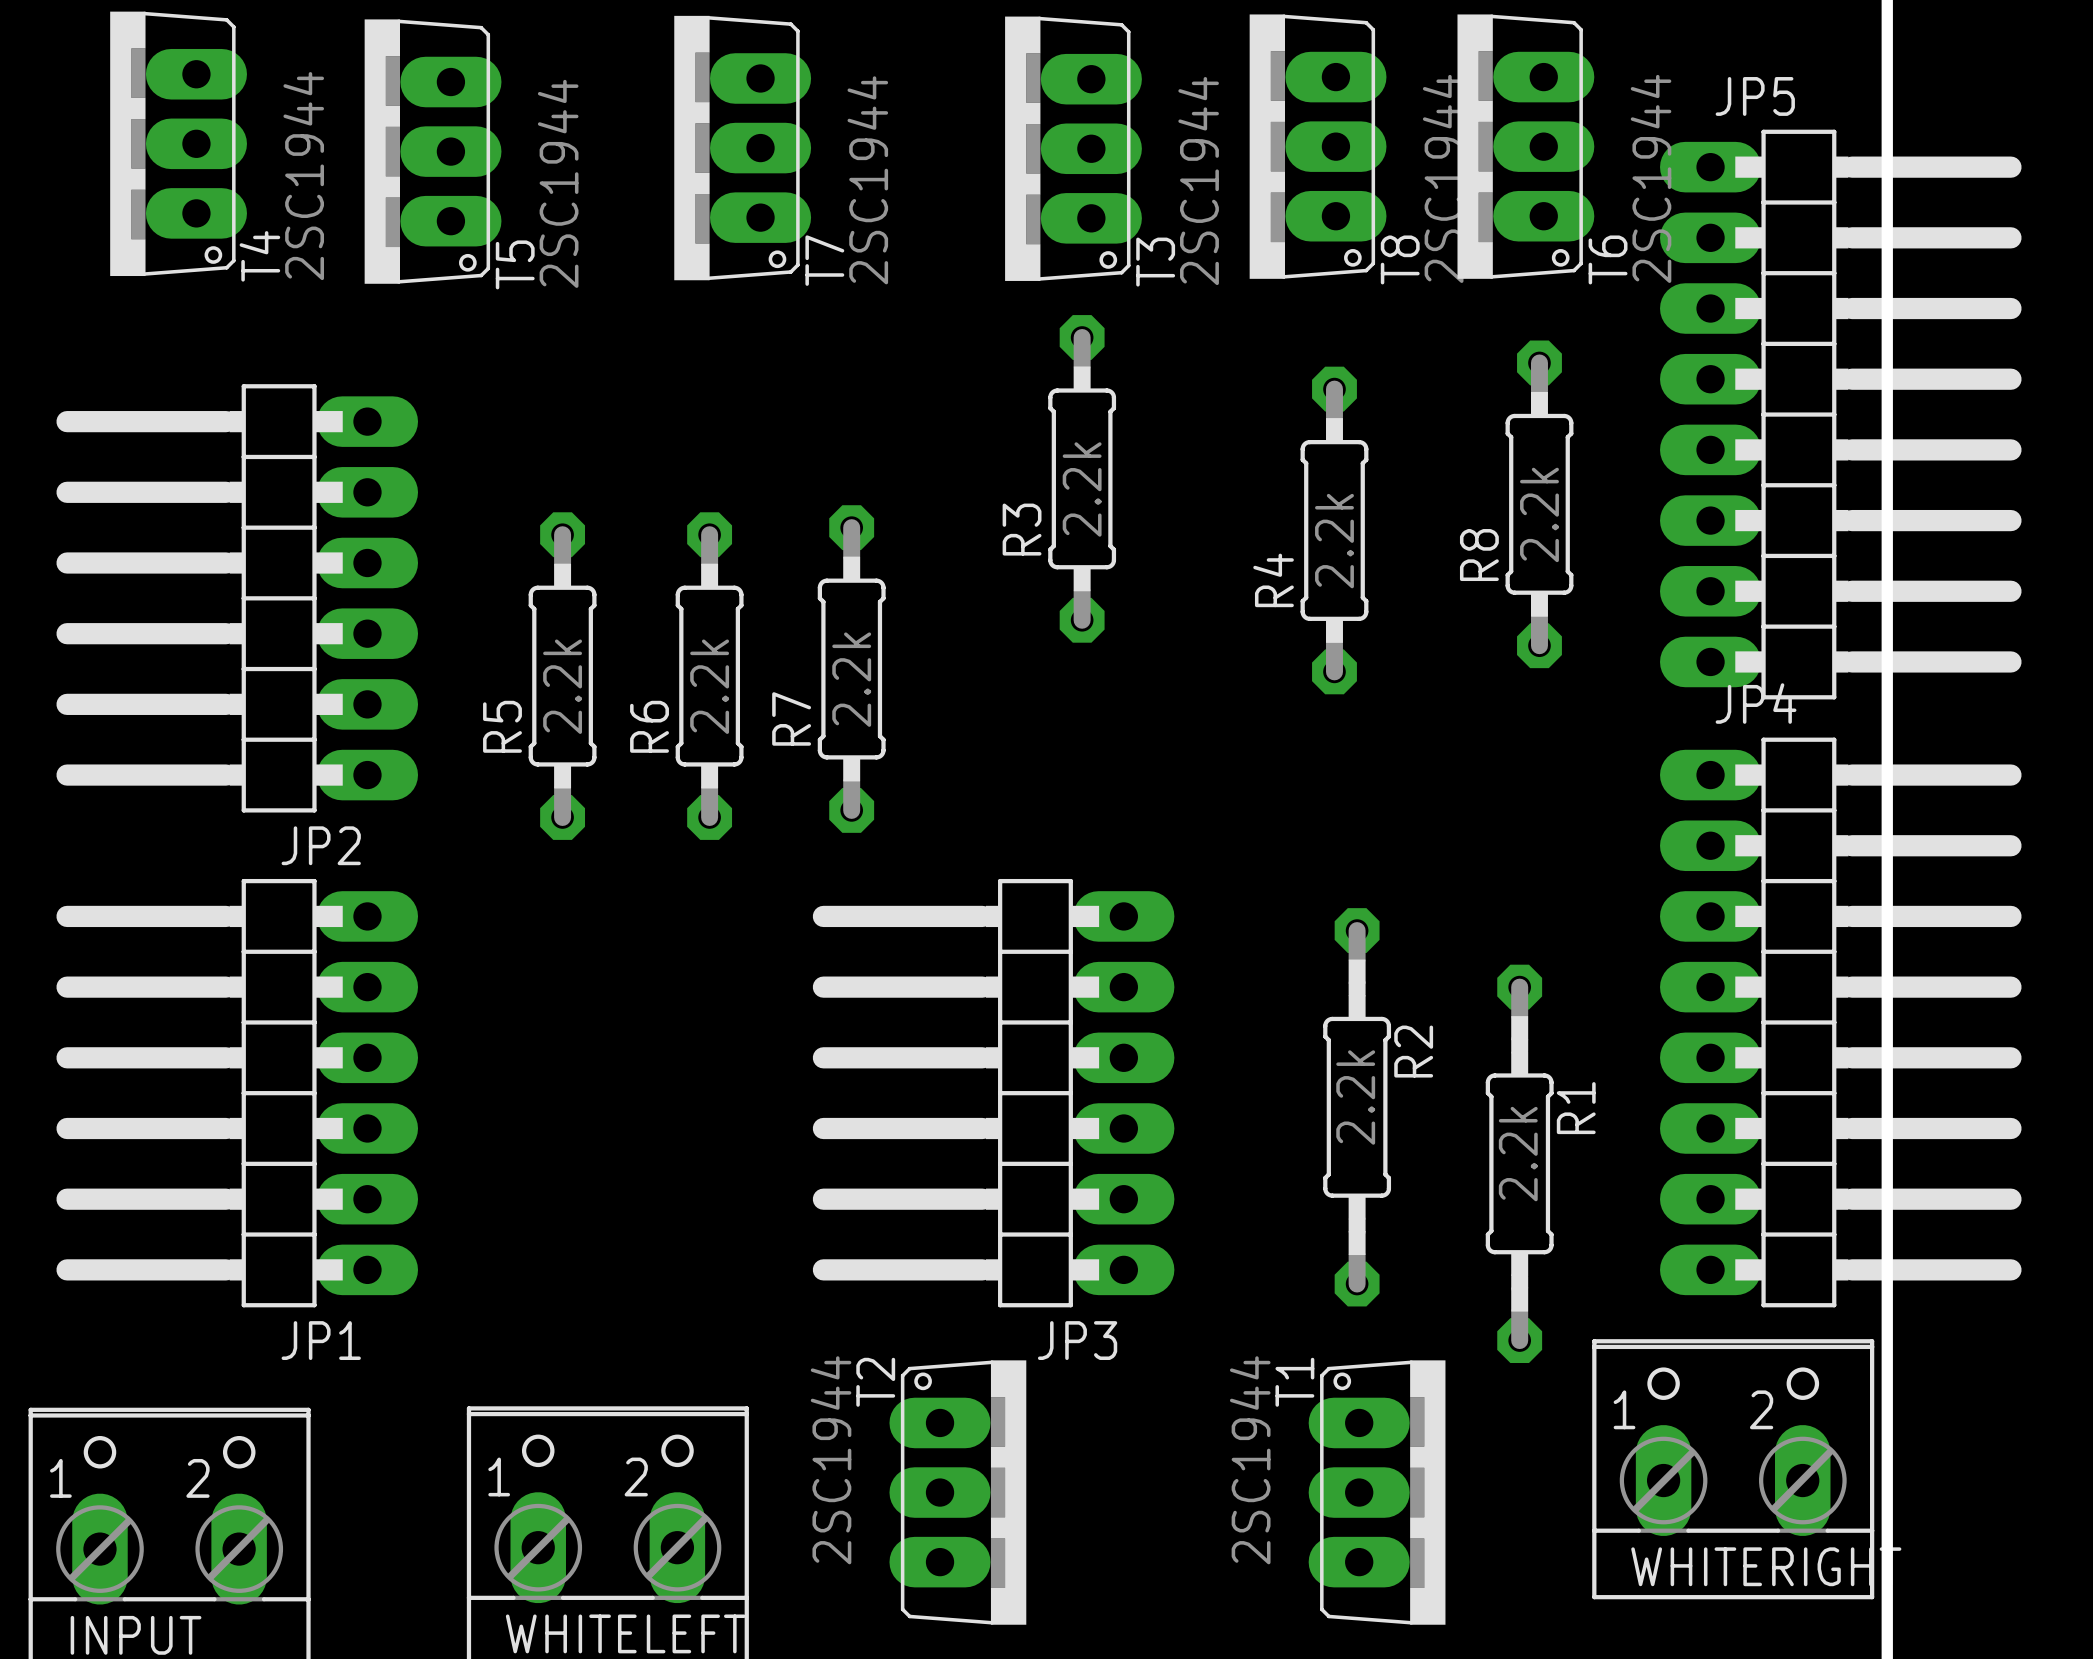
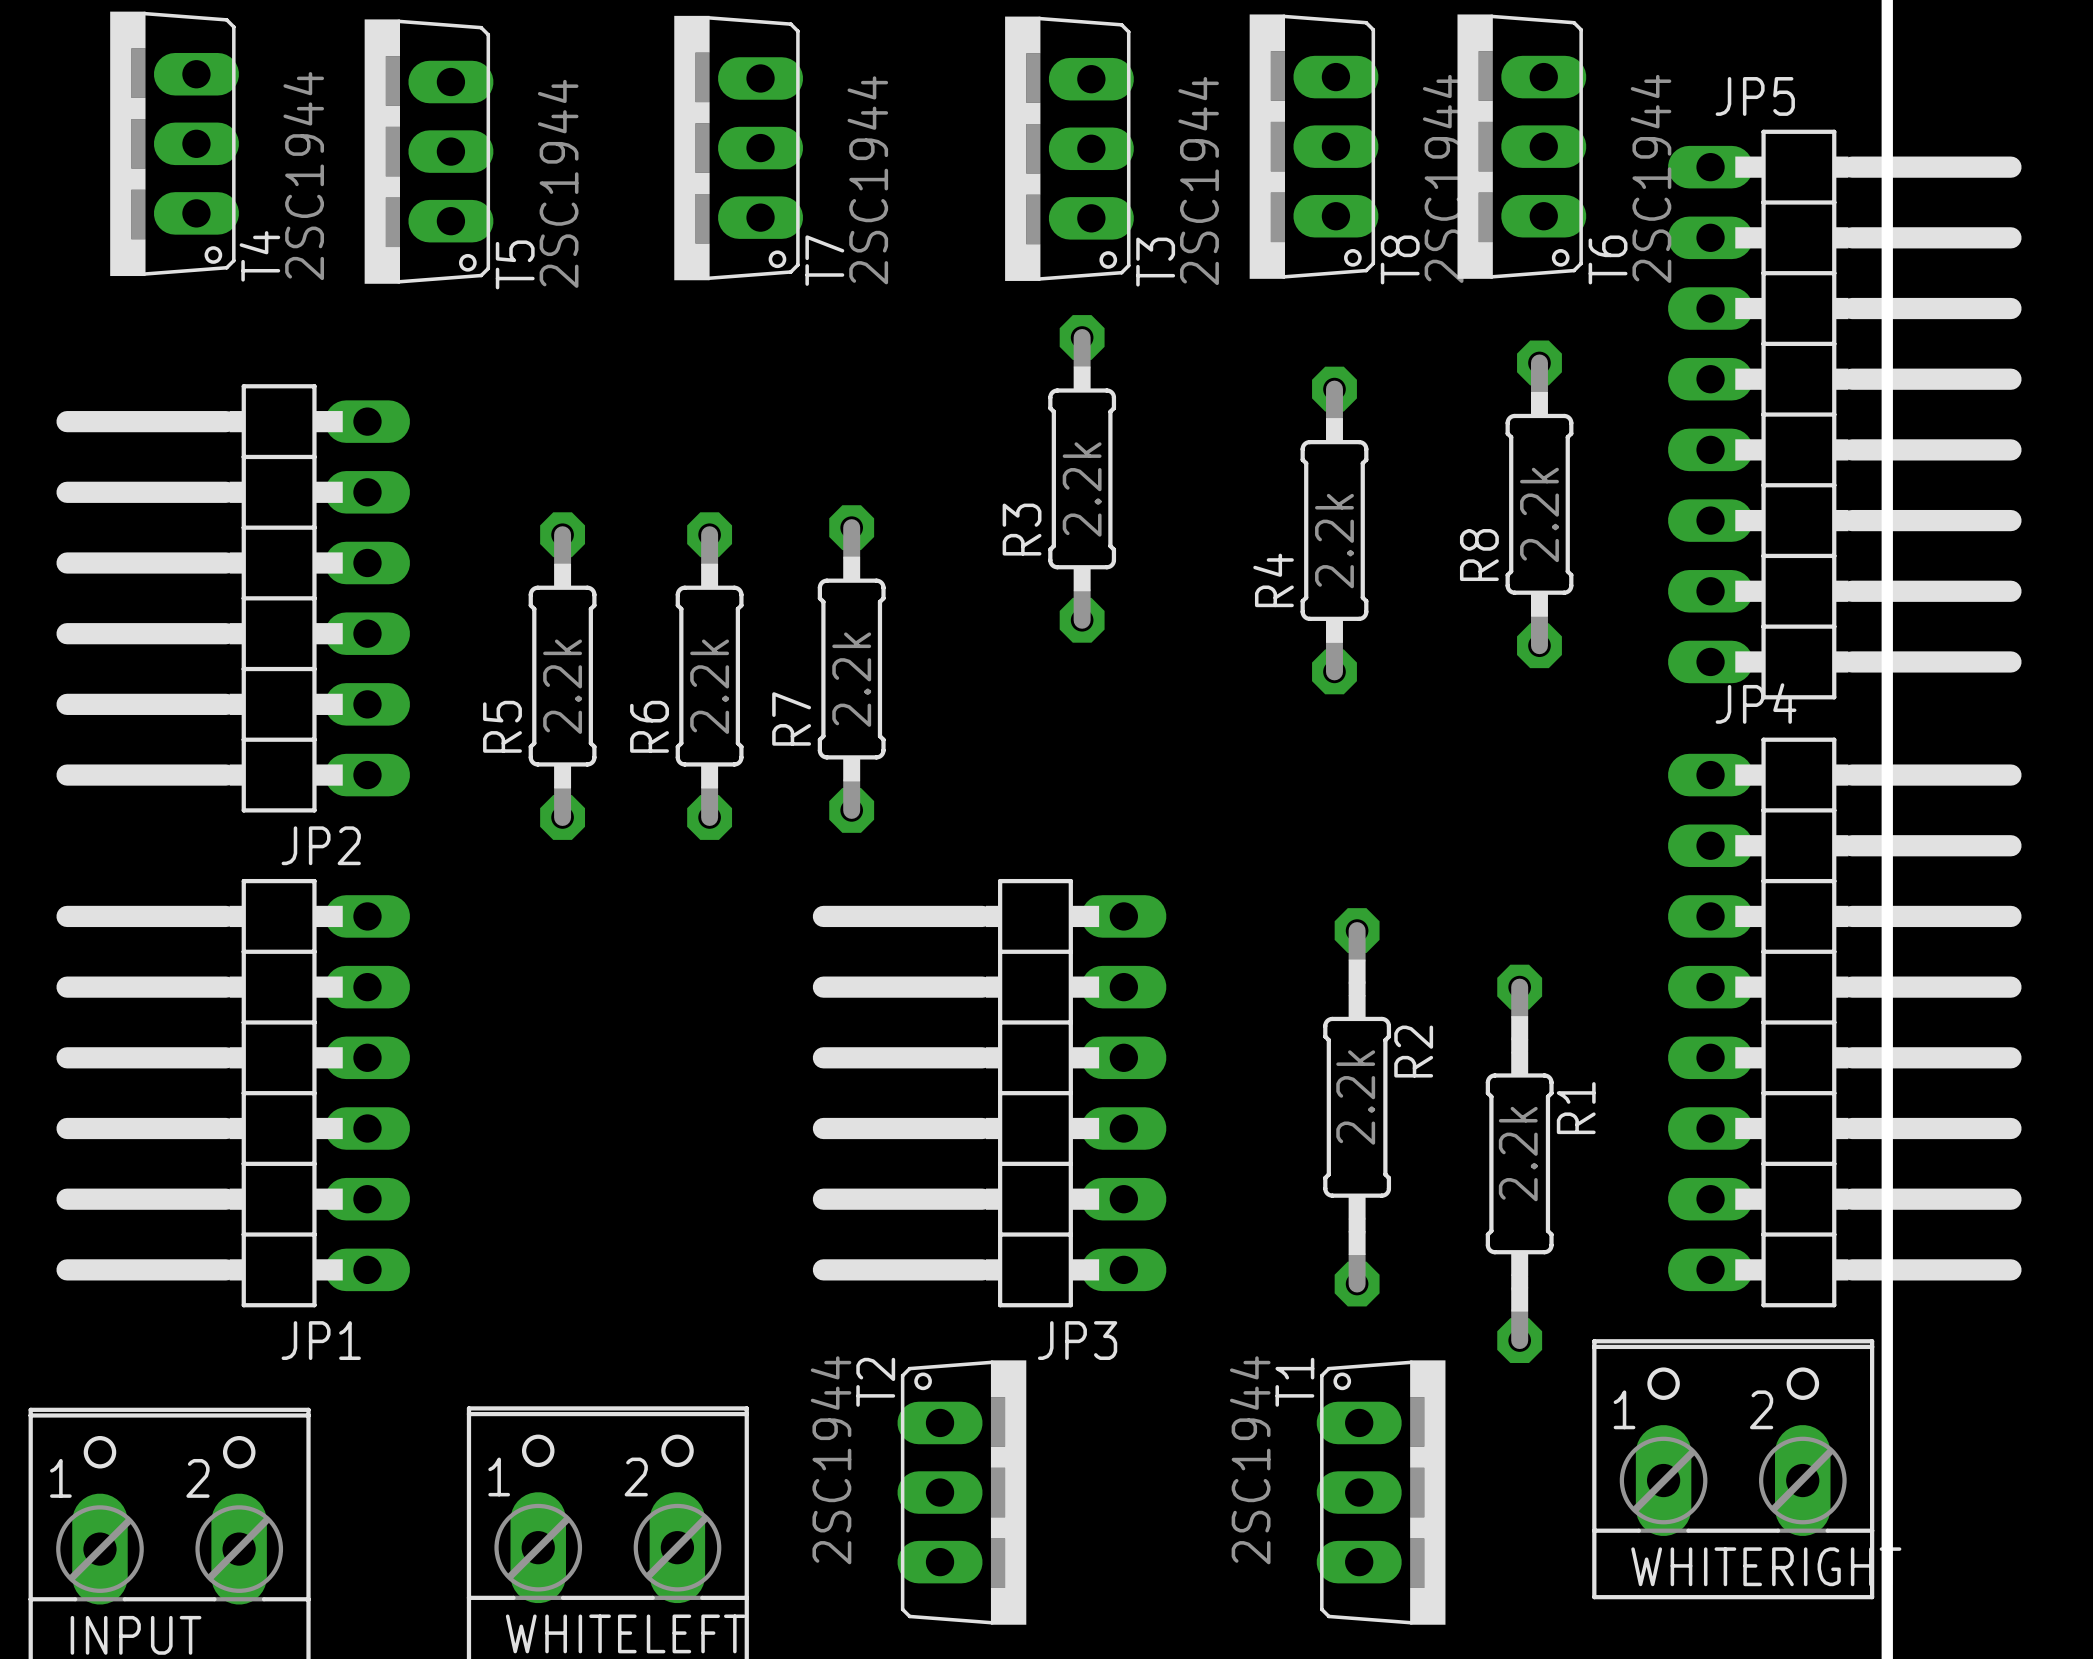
T4 footprint: [110, 11, 247, 277] -> [110, 11, 239, 277]
T8 footprint: [1249, 14, 1387, 279] -> [1249, 14, 1379, 279]
T6 footprint: [1457, 14, 1595, 279] -> [1457, 14, 1587, 279]
T7 footprint: [674, 15, 812, 281] -> [674, 15, 804, 281]
T3 footprint: [1005, 16, 1142, 281] -> [1005, 16, 1134, 281]
T5 footprint: [364, 19, 502, 284] -> [364, 19, 494, 284]
JP5 footprint: [1660, 129, 2022, 700] -> [1668, 129, 2022, 700]
JP2 footprint: [56, 384, 419, 813] -> [56, 384, 411, 813]
JP4 footprint: [1660, 737, 2022, 1308] -> [1668, 737, 2022, 1308]
JP1 footprint: [56, 878, 419, 1308] -> [56, 878, 411, 1308]
JP3 footprint: [812, 878, 1175, 1308] -> [812, 878, 1167, 1308]
T2 footprint: [889, 1360, 1027, 1625] -> [897, 1360, 1027, 1625]
T1 footprint: [1308, 1360, 1446, 1625] -> [1316, 1360, 1446, 1625]

